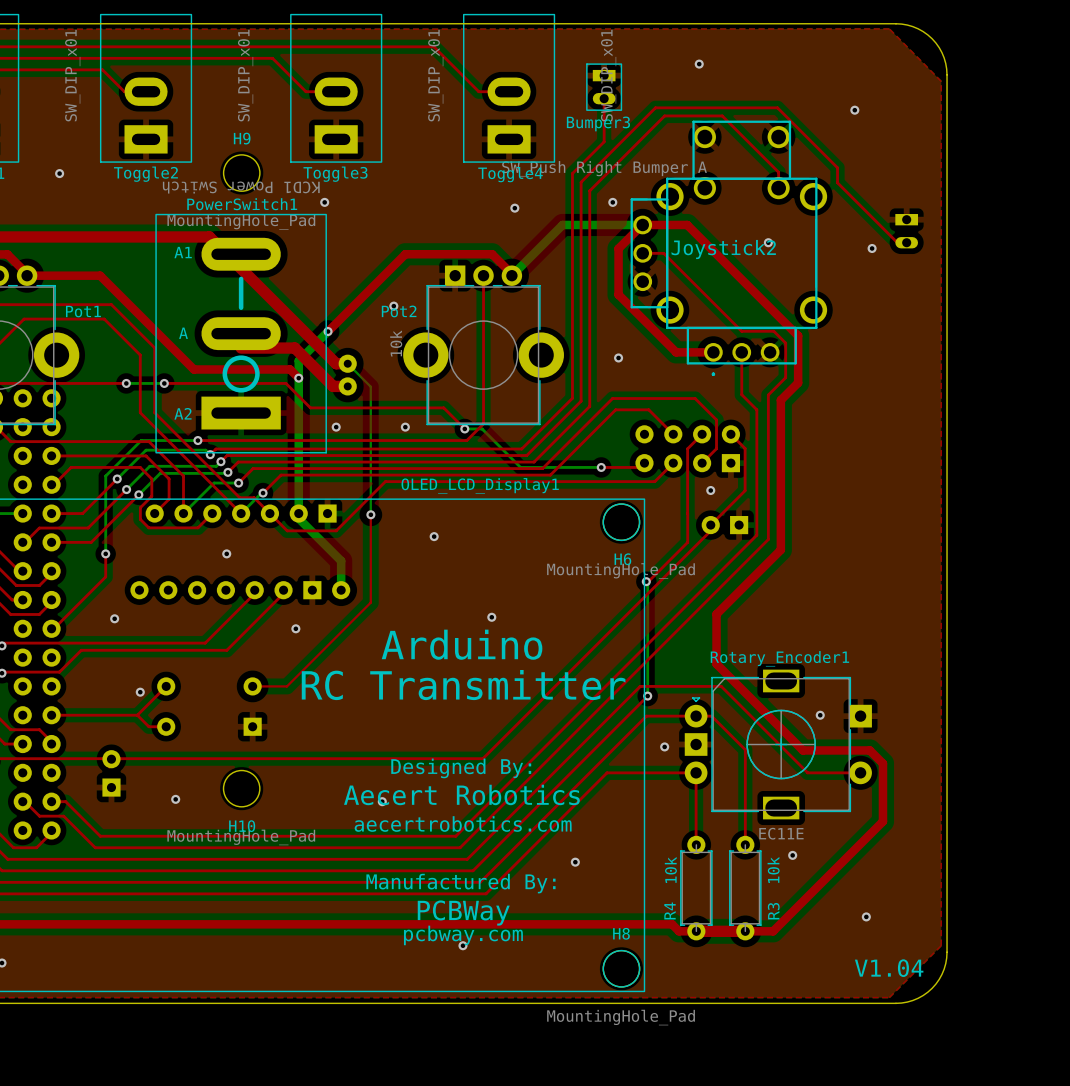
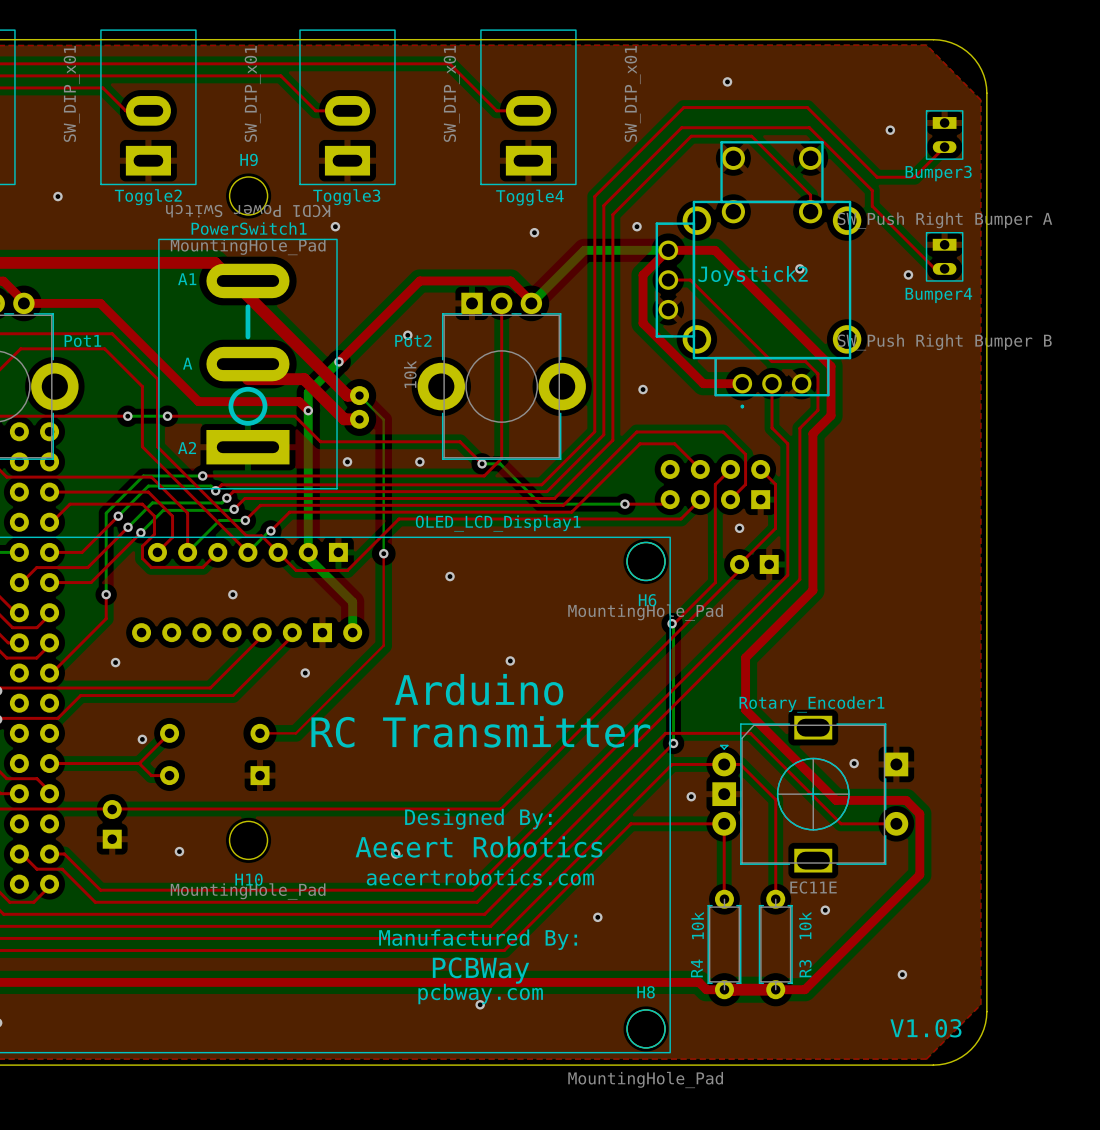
Bumper3 position: (604, 87) -> (944, 135)
top track: (604, 98) (604, 141) -> (944, 147) (914, 177) (877, 177) (807, 107) (683, 107) (627, 163)
Bumper4 side: bottom (906, 231) -> top (944, 256)
text: V1.04 (889, 968) -> V1.03 (925, 1028)

